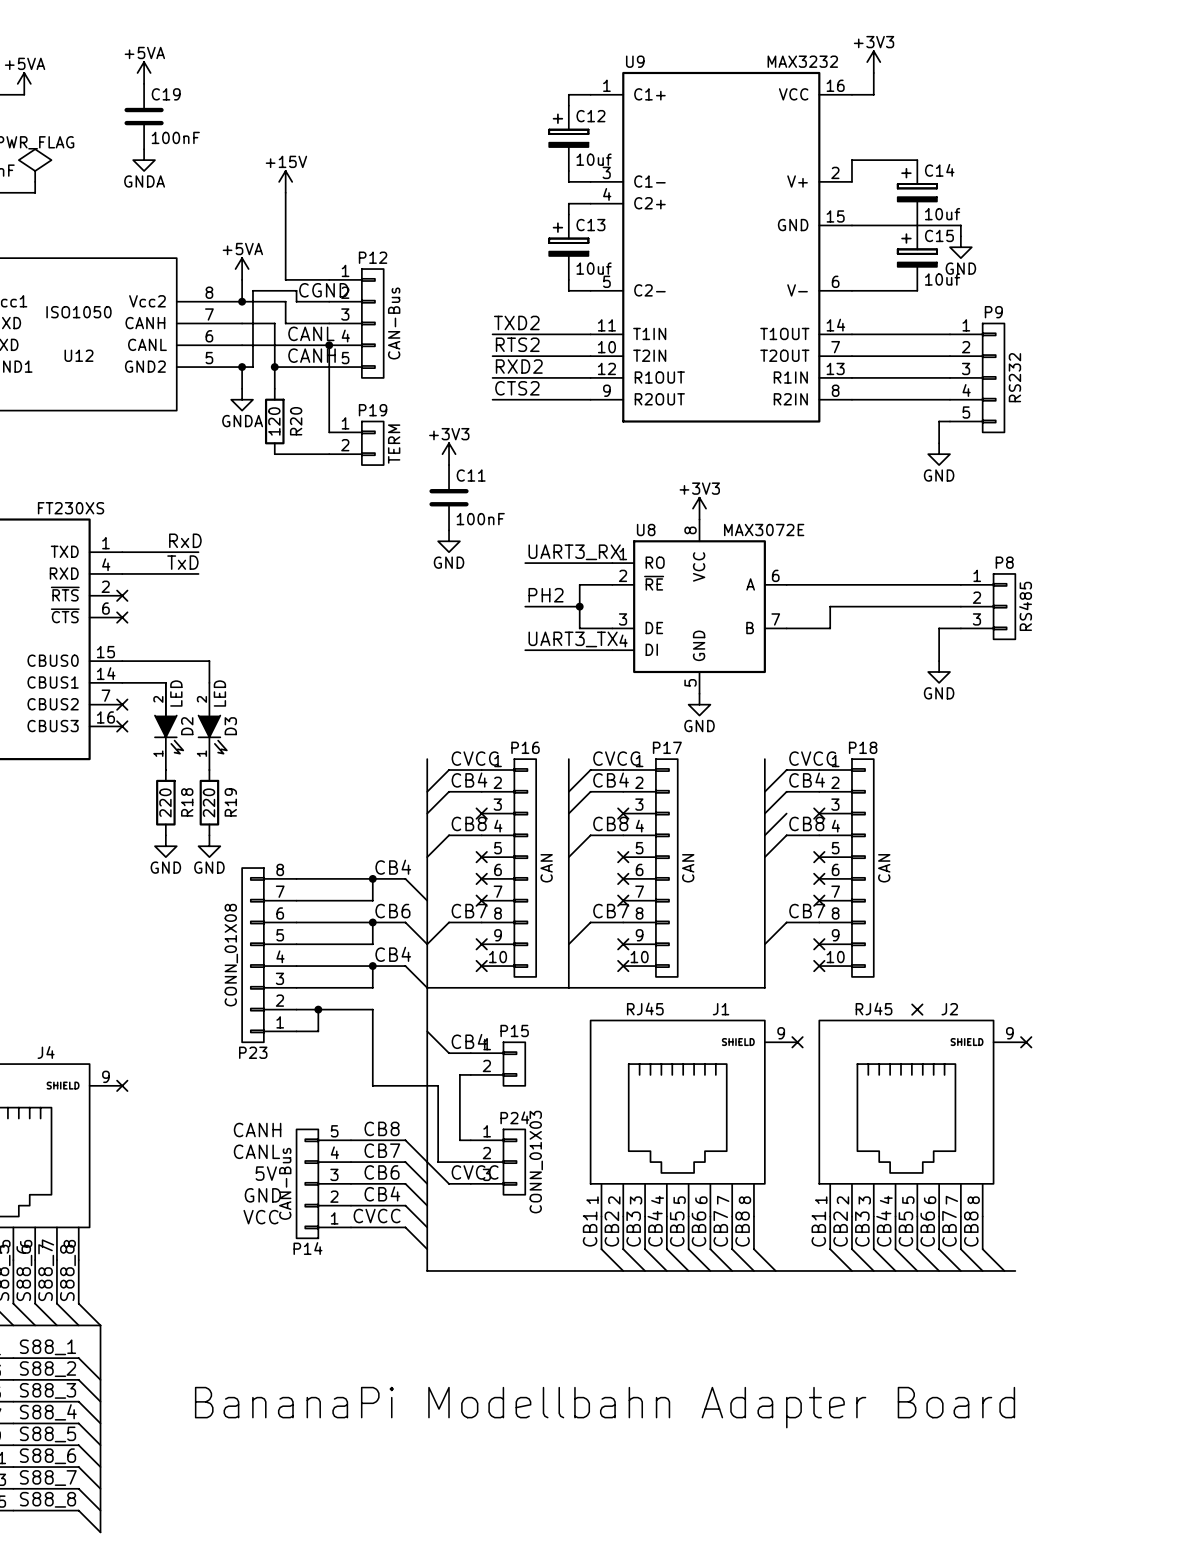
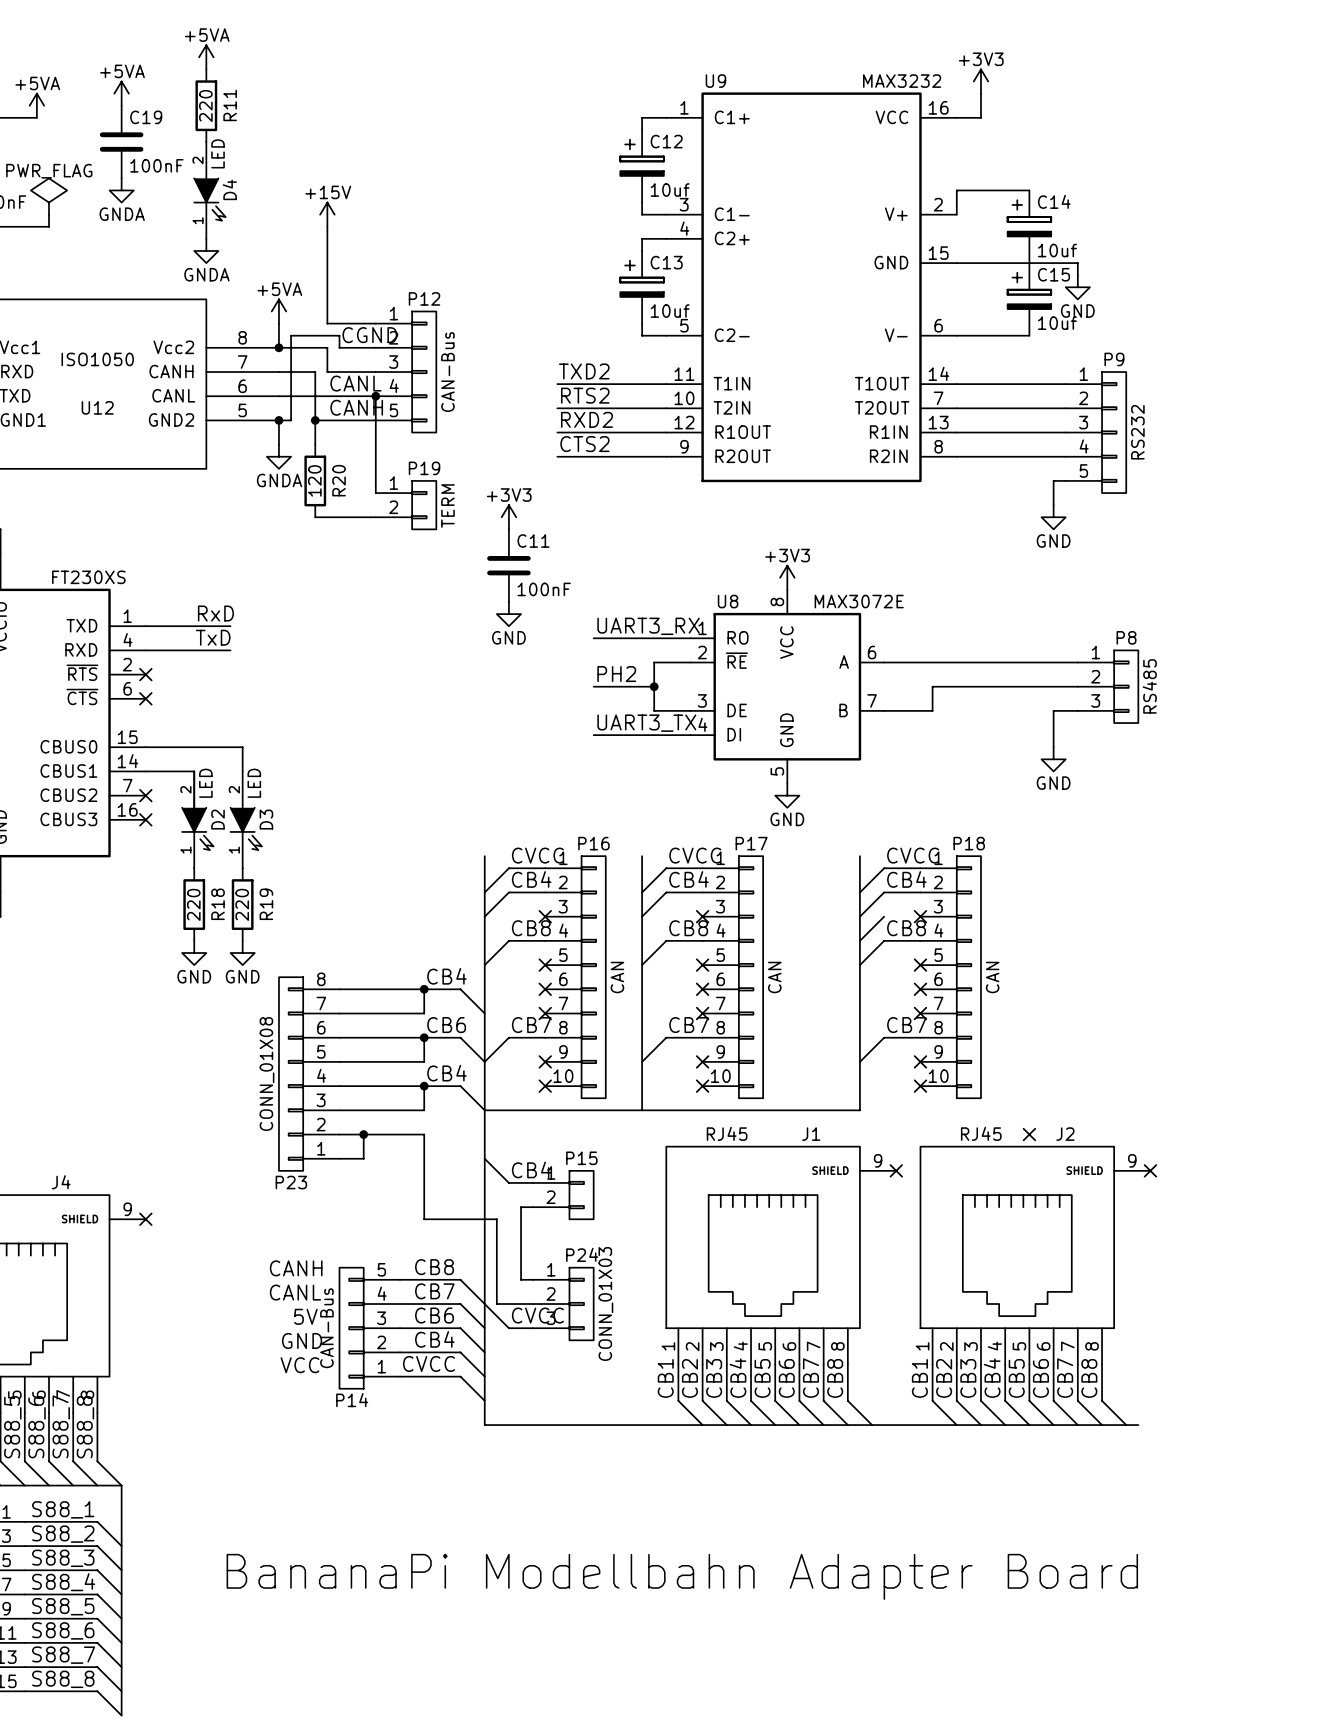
power symbol: none -> +5VA (206, 57)
power symbol: none -> +5VA (121, 93)
power symbol: +5VA (144, 72) -> none
R11: none -> 220 (206, 105)
C19 position: (144, 116) -> (121, 142)
power symbol: none -> GNDA (121, 190)
power symbol: GNDA (144, 160) -> none
D4: none -> LED (209, 190)
power symbol: none -> GNDA (206, 250)

